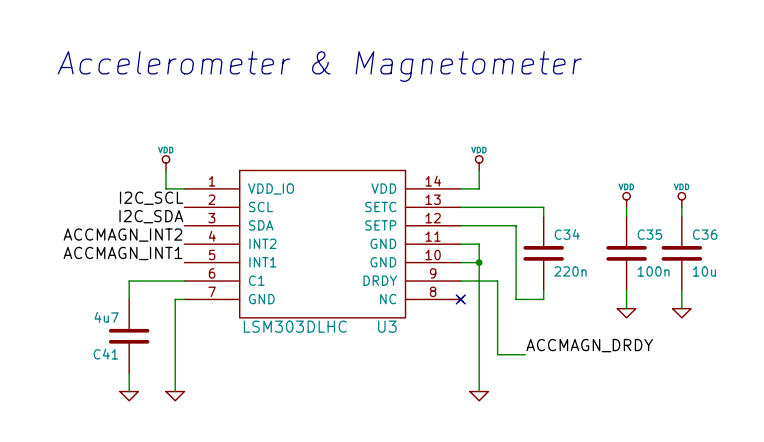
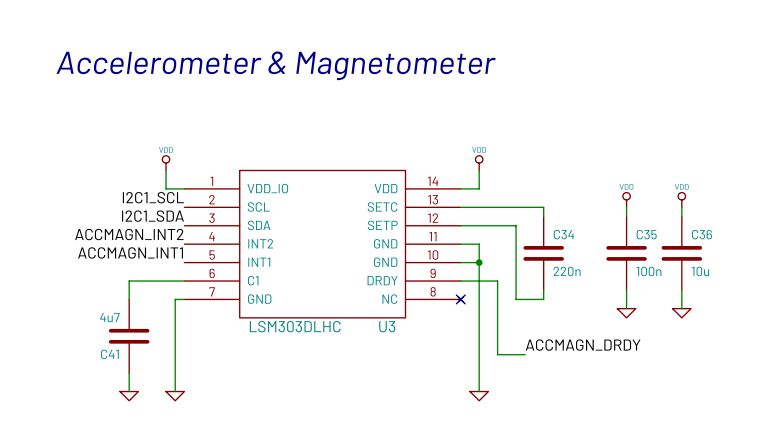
label: I2C_SCL (151, 198) -> I2C1_SCL (153, 197)
label: I2C_SDA (151, 216) -> I2C1_SDA (152, 216)

